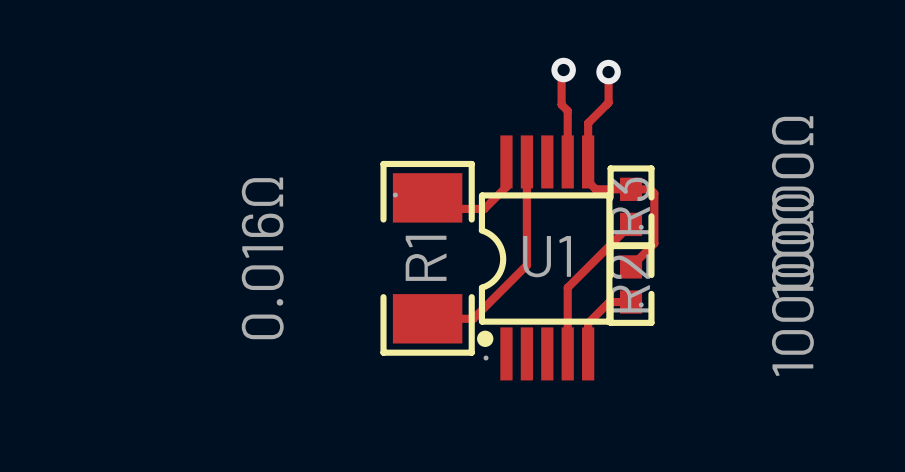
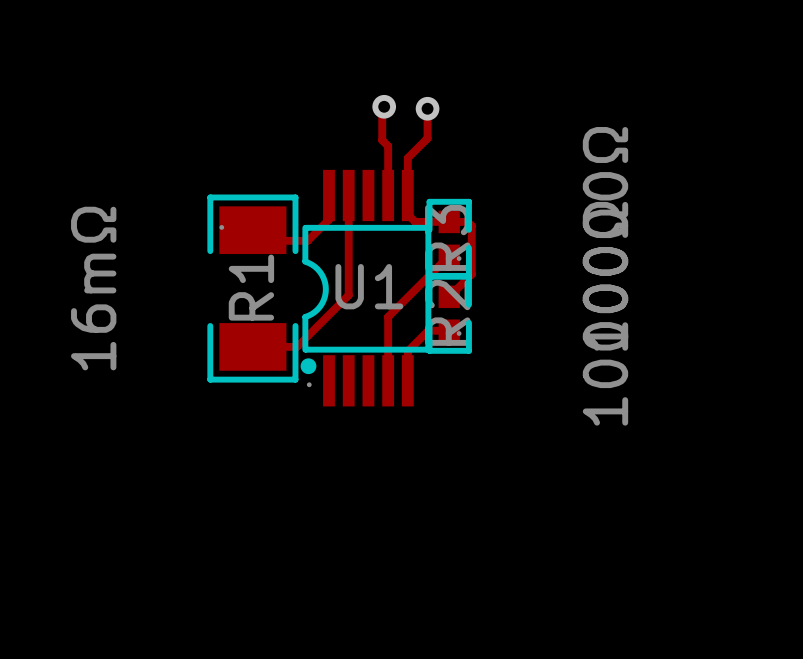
R1 value: 0.016Ω (262, 258) -> 16mΩ (93, 288)

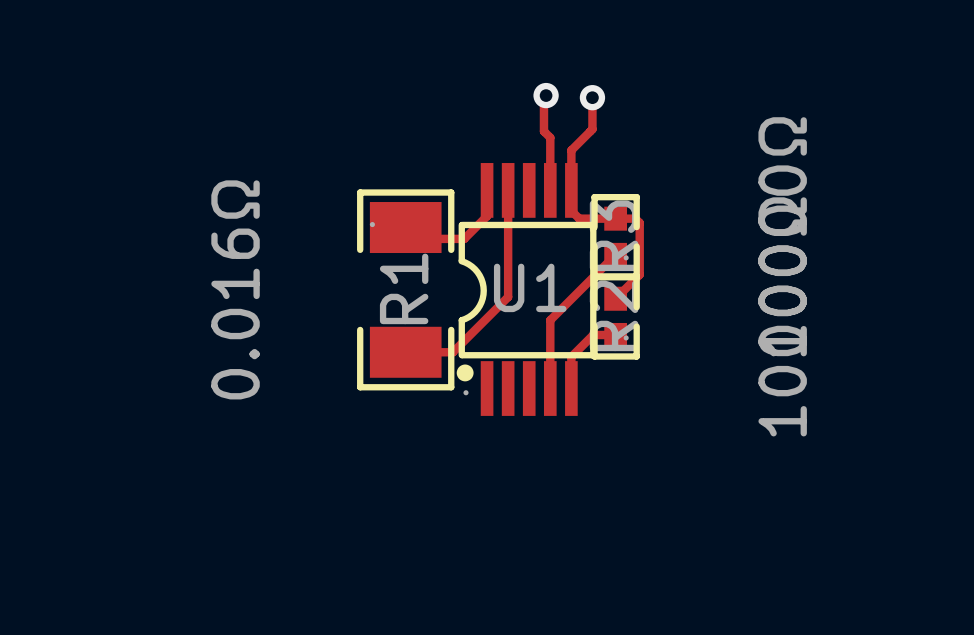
R1 value: 16mΩ (93, 288) -> 0.016Ω (235, 289)

